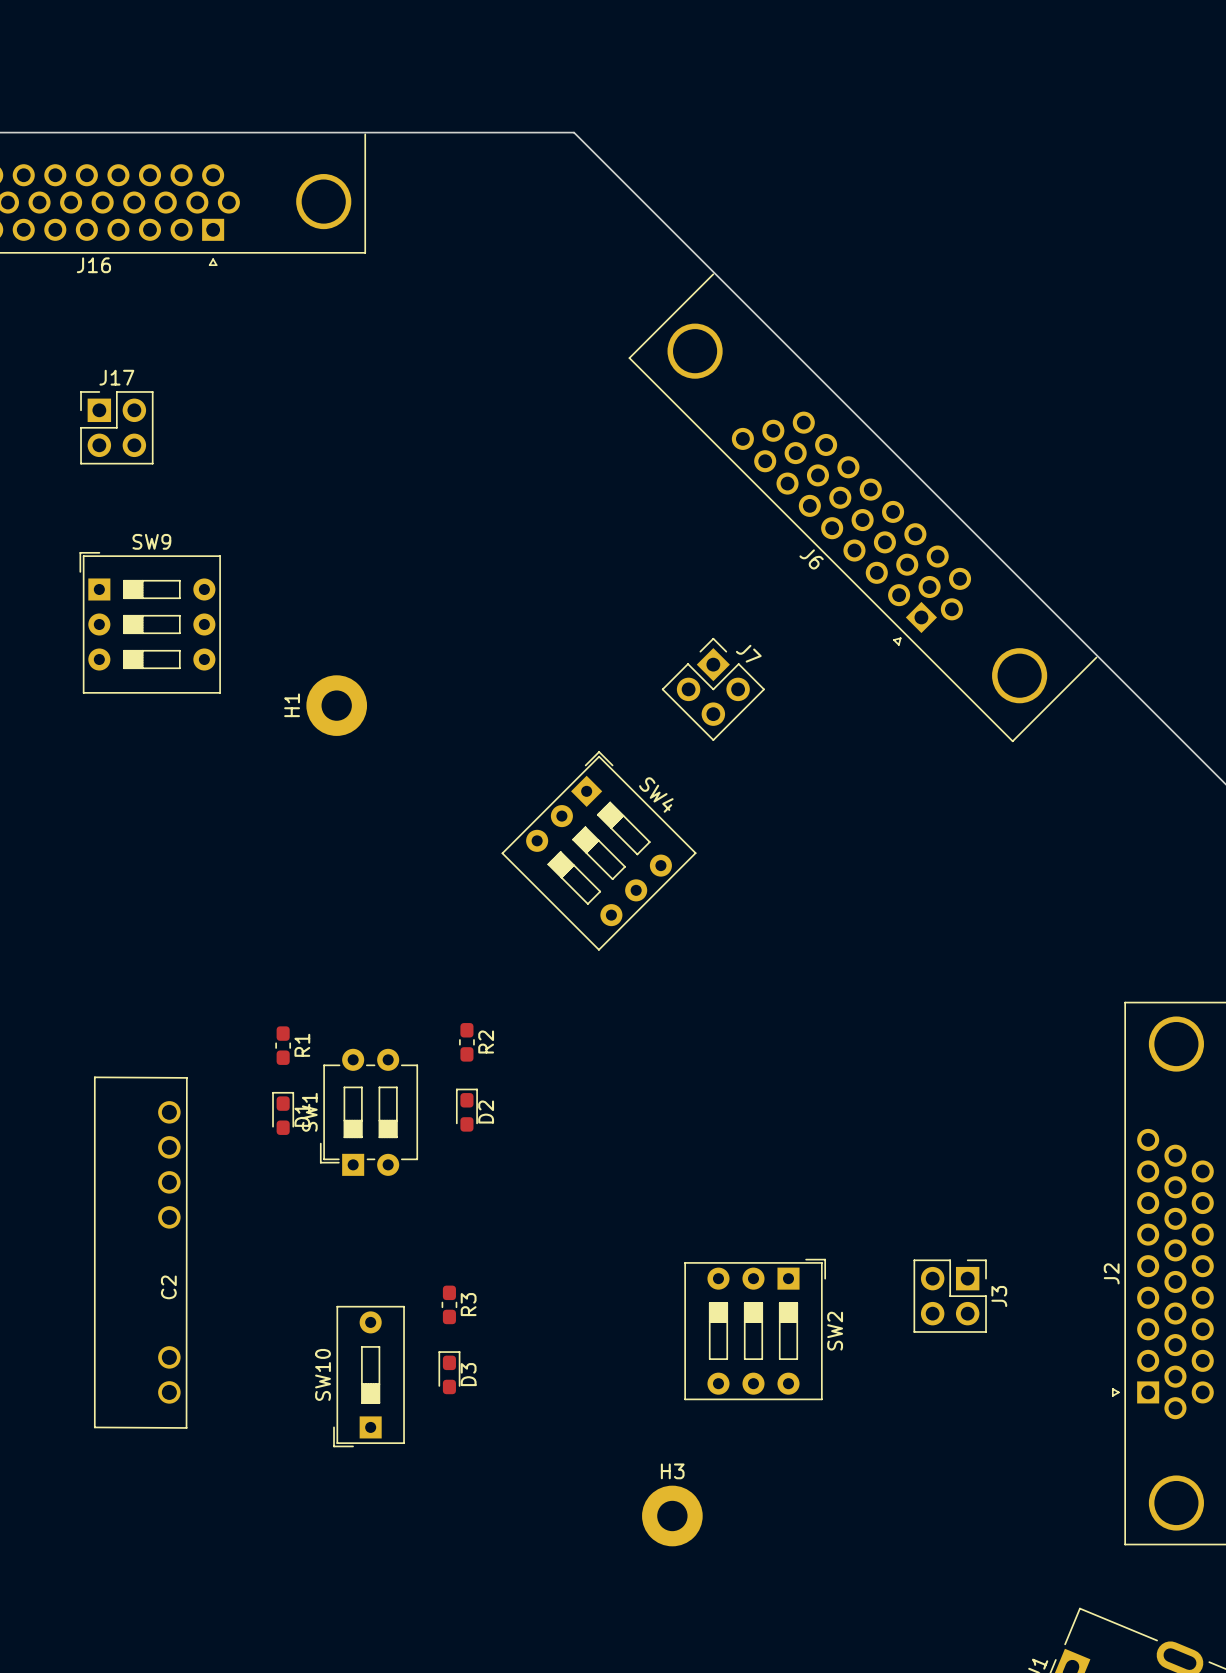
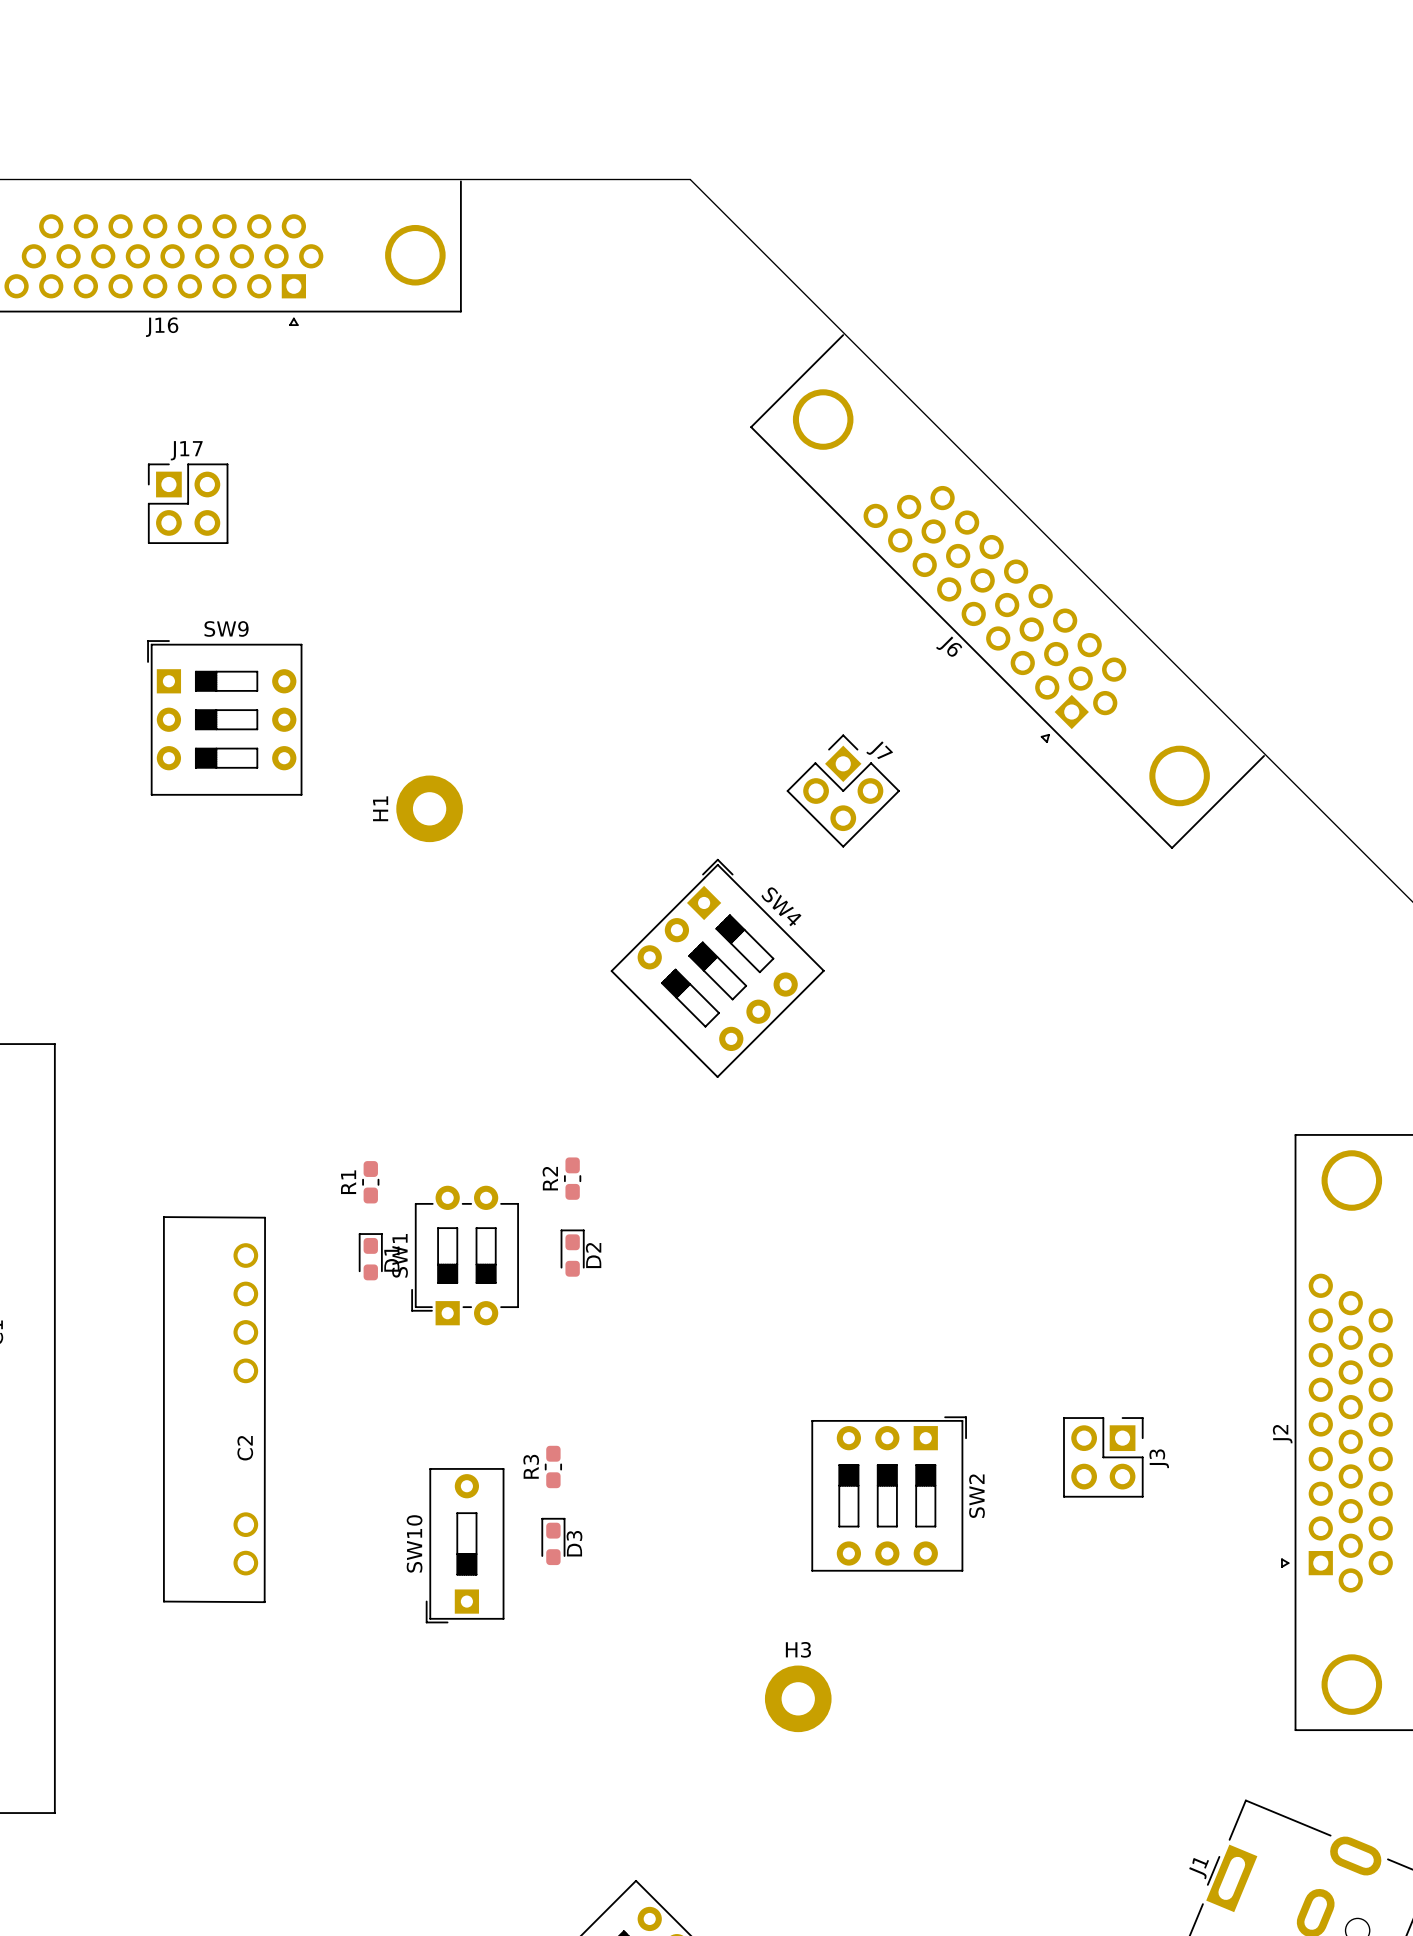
R2 name position: R2 (486, 1042) -> R2 (550, 1178)
R1 name position: R1 (302, 1045) -> R1 (348, 1182)
R3 name position: R3 (468, 1304) -> R3 (531, 1466)

